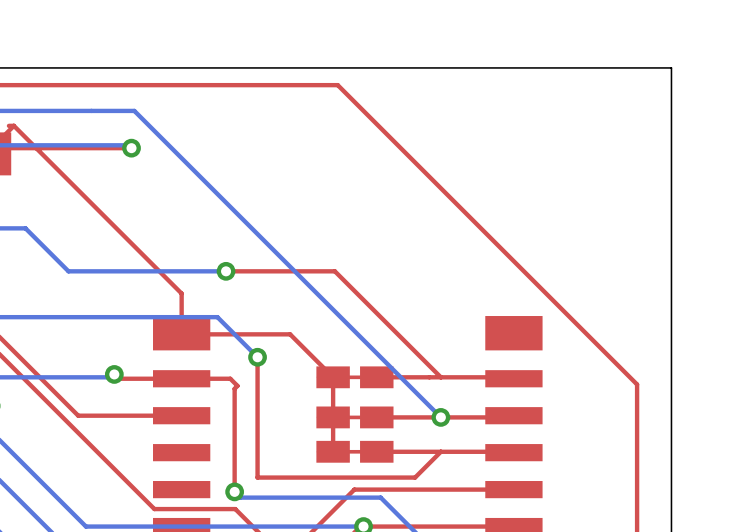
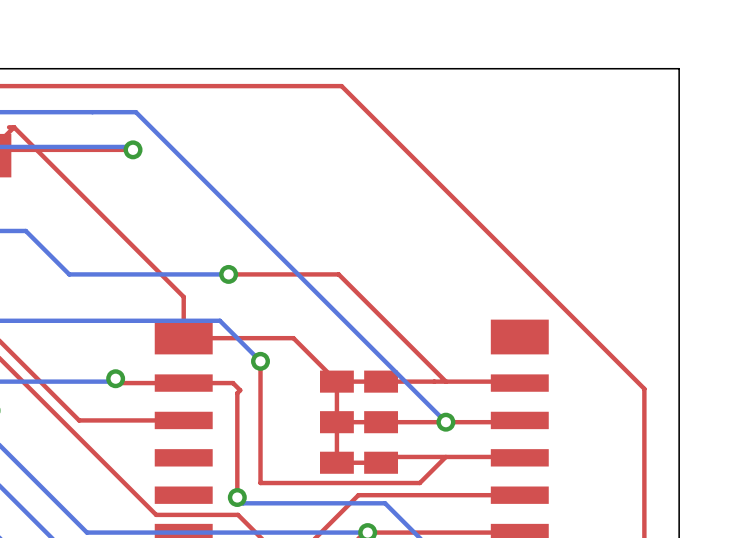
part footprint: [316, 366, 394, 389] -> [320, 370, 399, 393]
part footprint: [316, 406, 394, 429] -> [320, 411, 399, 434]
part footprint: [316, 440, 394, 463] -> [320, 451, 399, 474]

